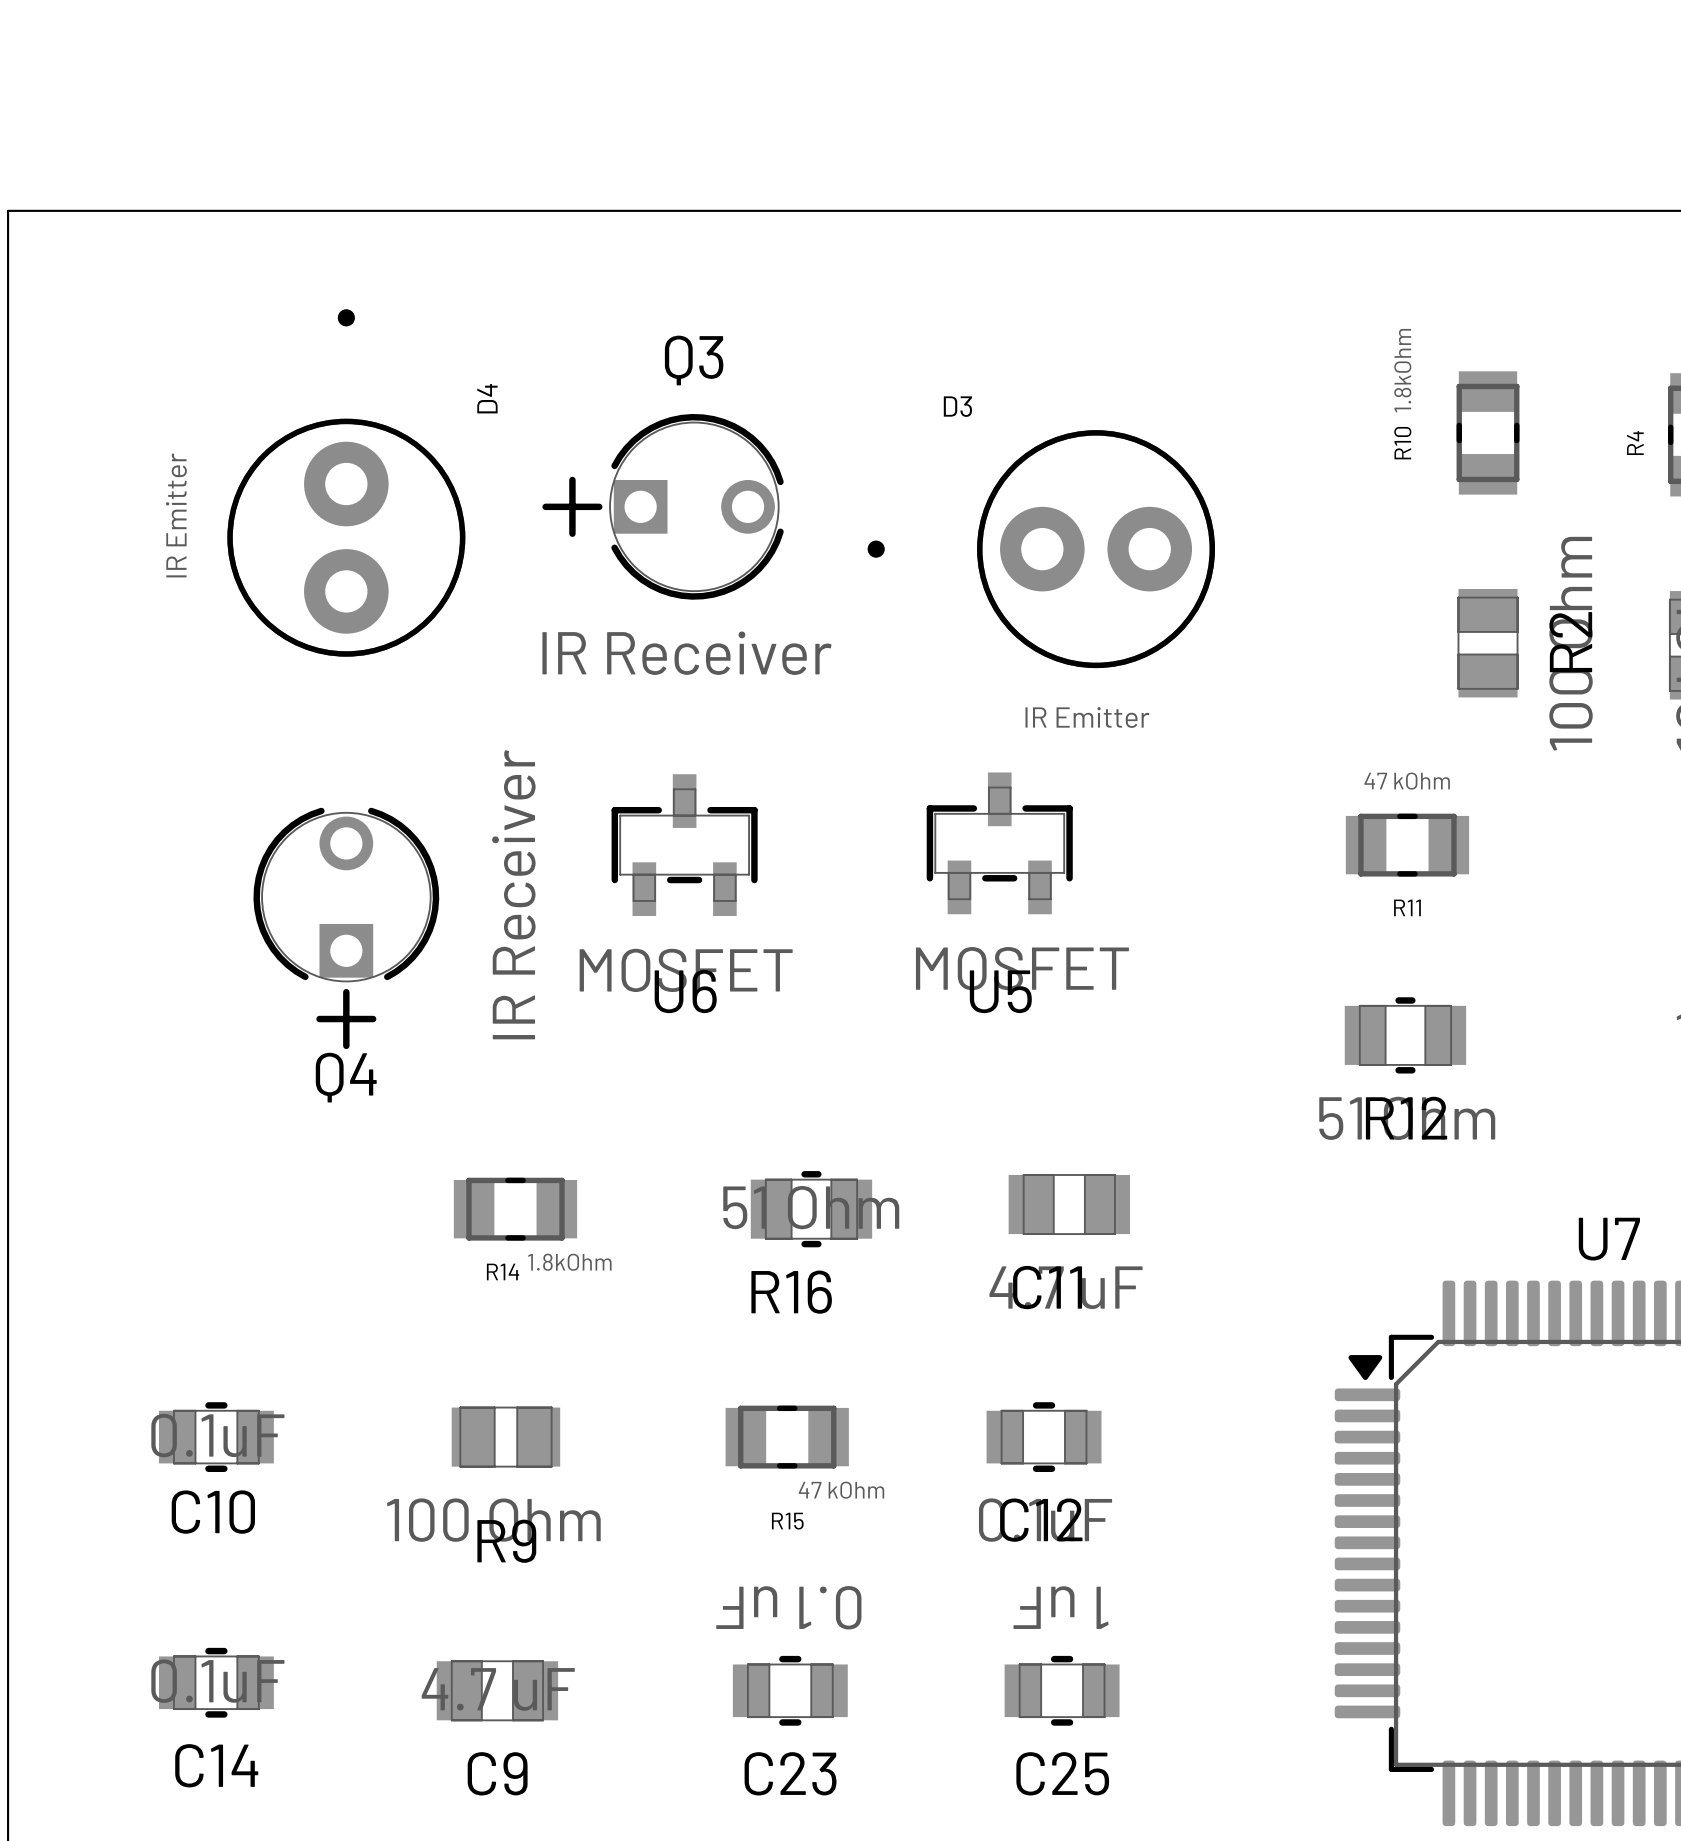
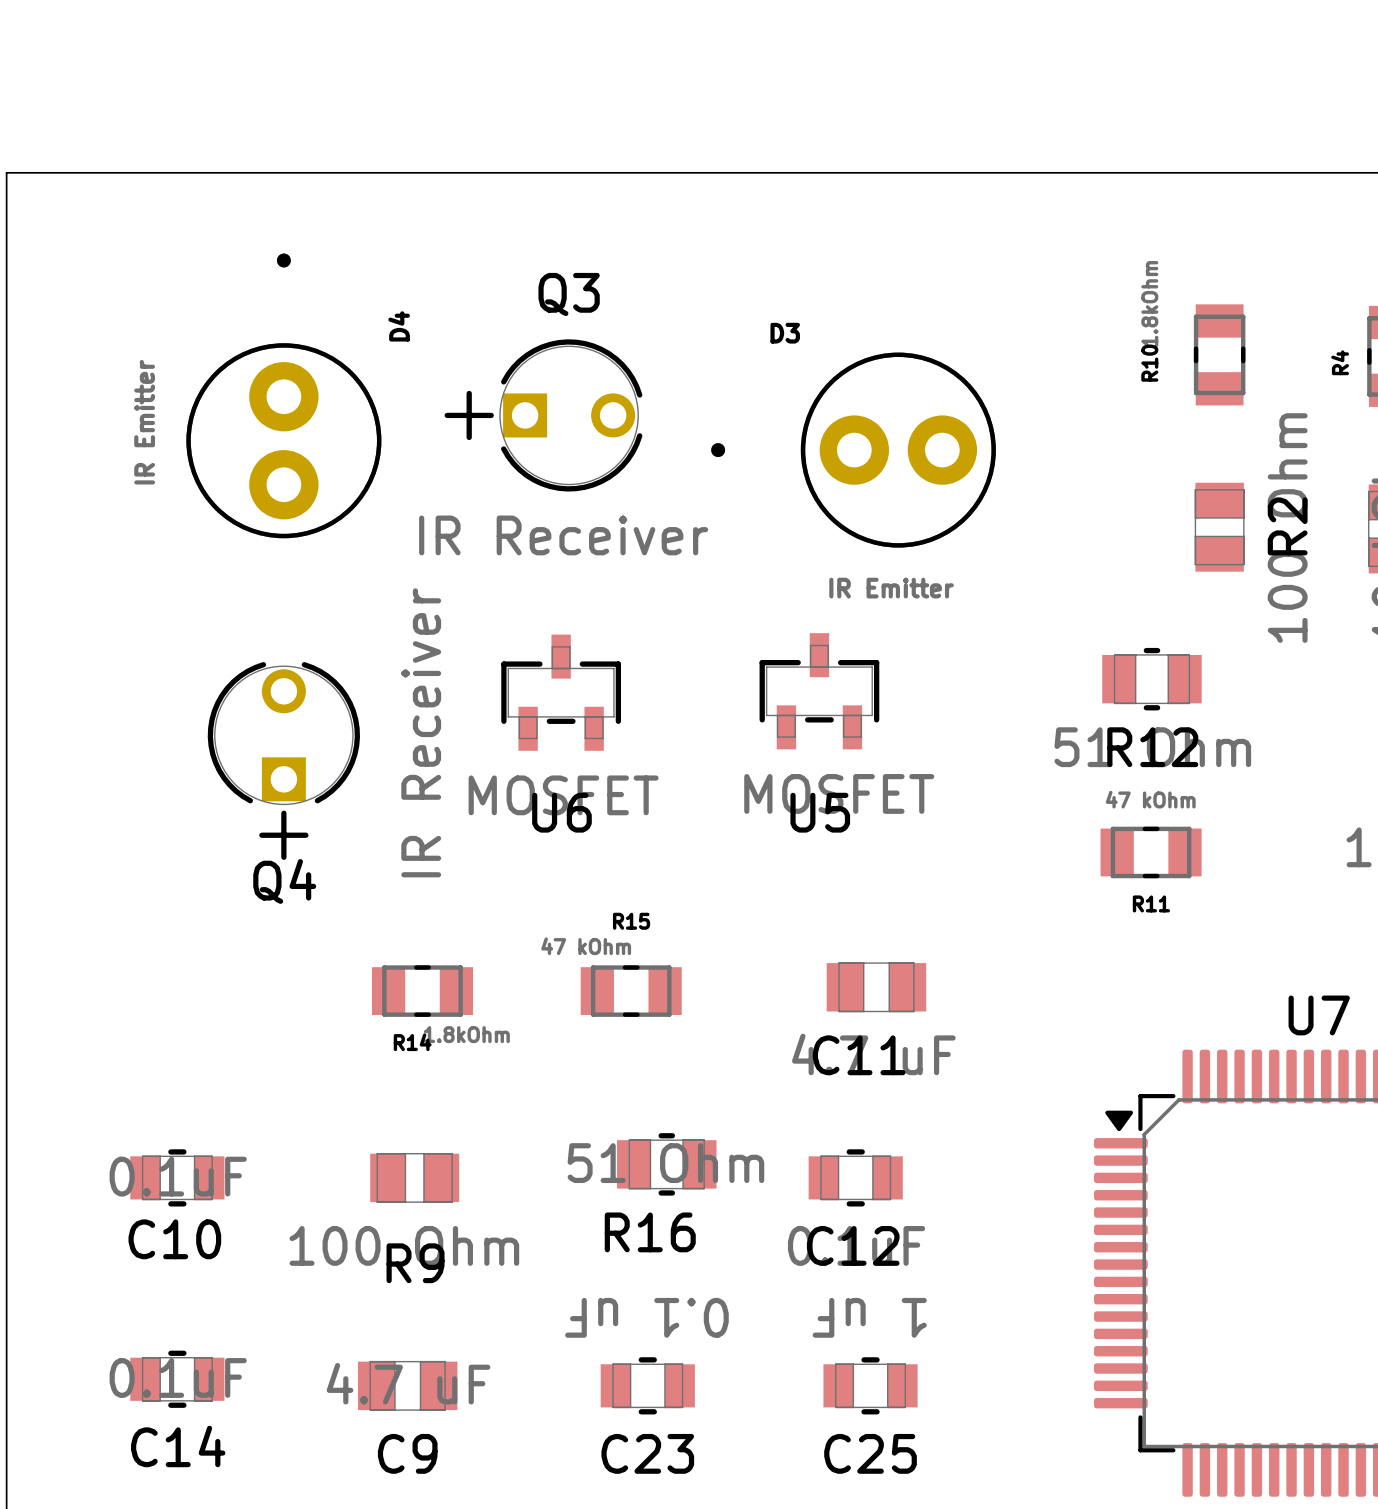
R11 position: (1407, 845) -> (1151, 852)
R12 position: (1405, 1035) -> (1151, 679)
R16 position: (811, 1209) -> (666, 1164)
R15 position: (787, 1437) -> (631, 991)
R15 value position: 47 kOhm (841, 1490) -> 47 kOhm (586, 946)
R15 name position: R15 (787, 1521) -> R15 (631, 921)

